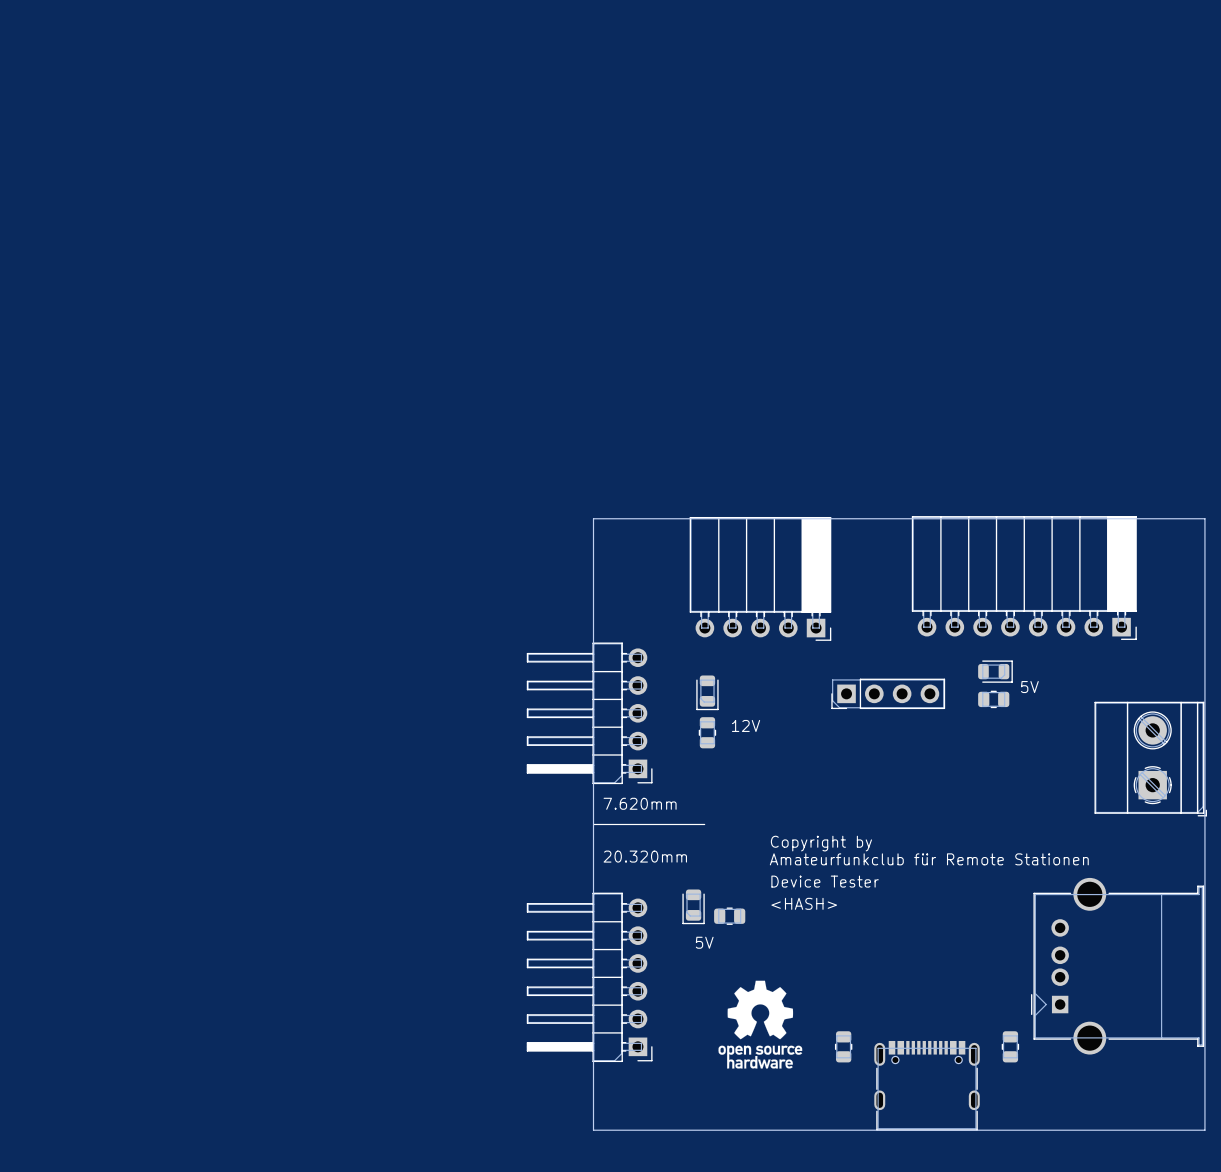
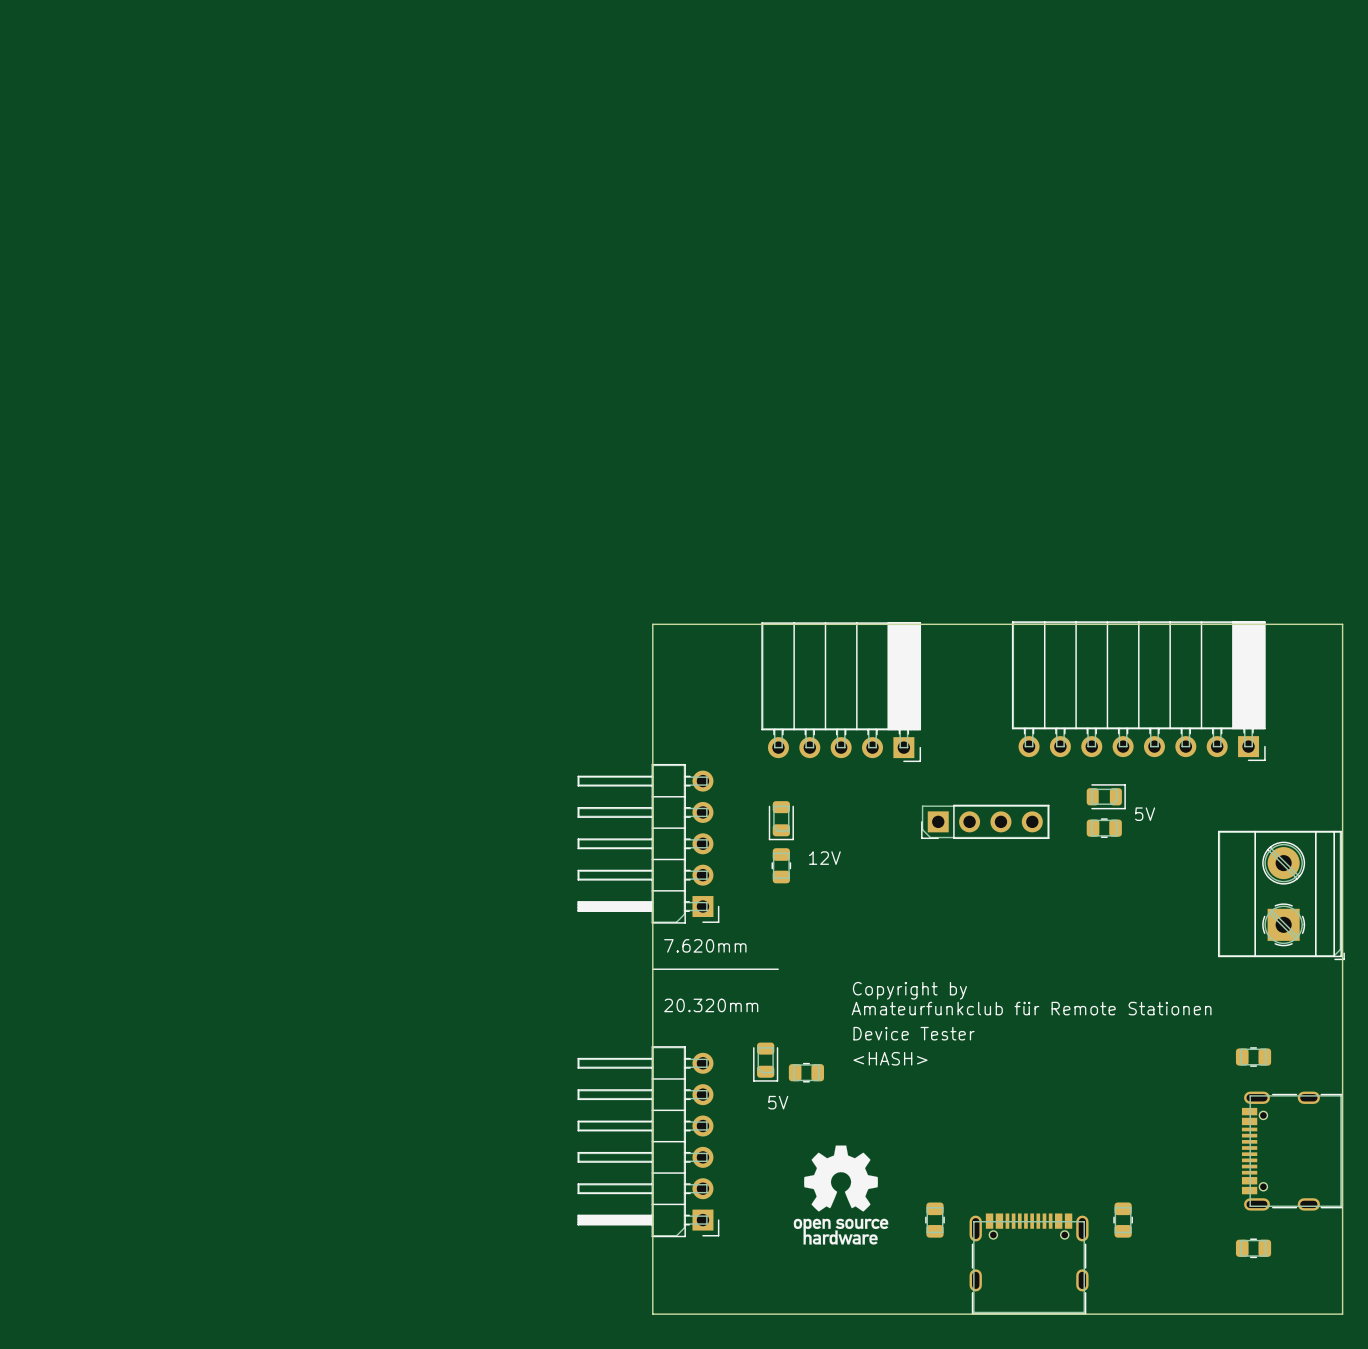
part: none -> (1253, 1057)
part: (1117, 966) -> none
part: none -> (1292, 1151)
part: none -> (1253, 1248)

